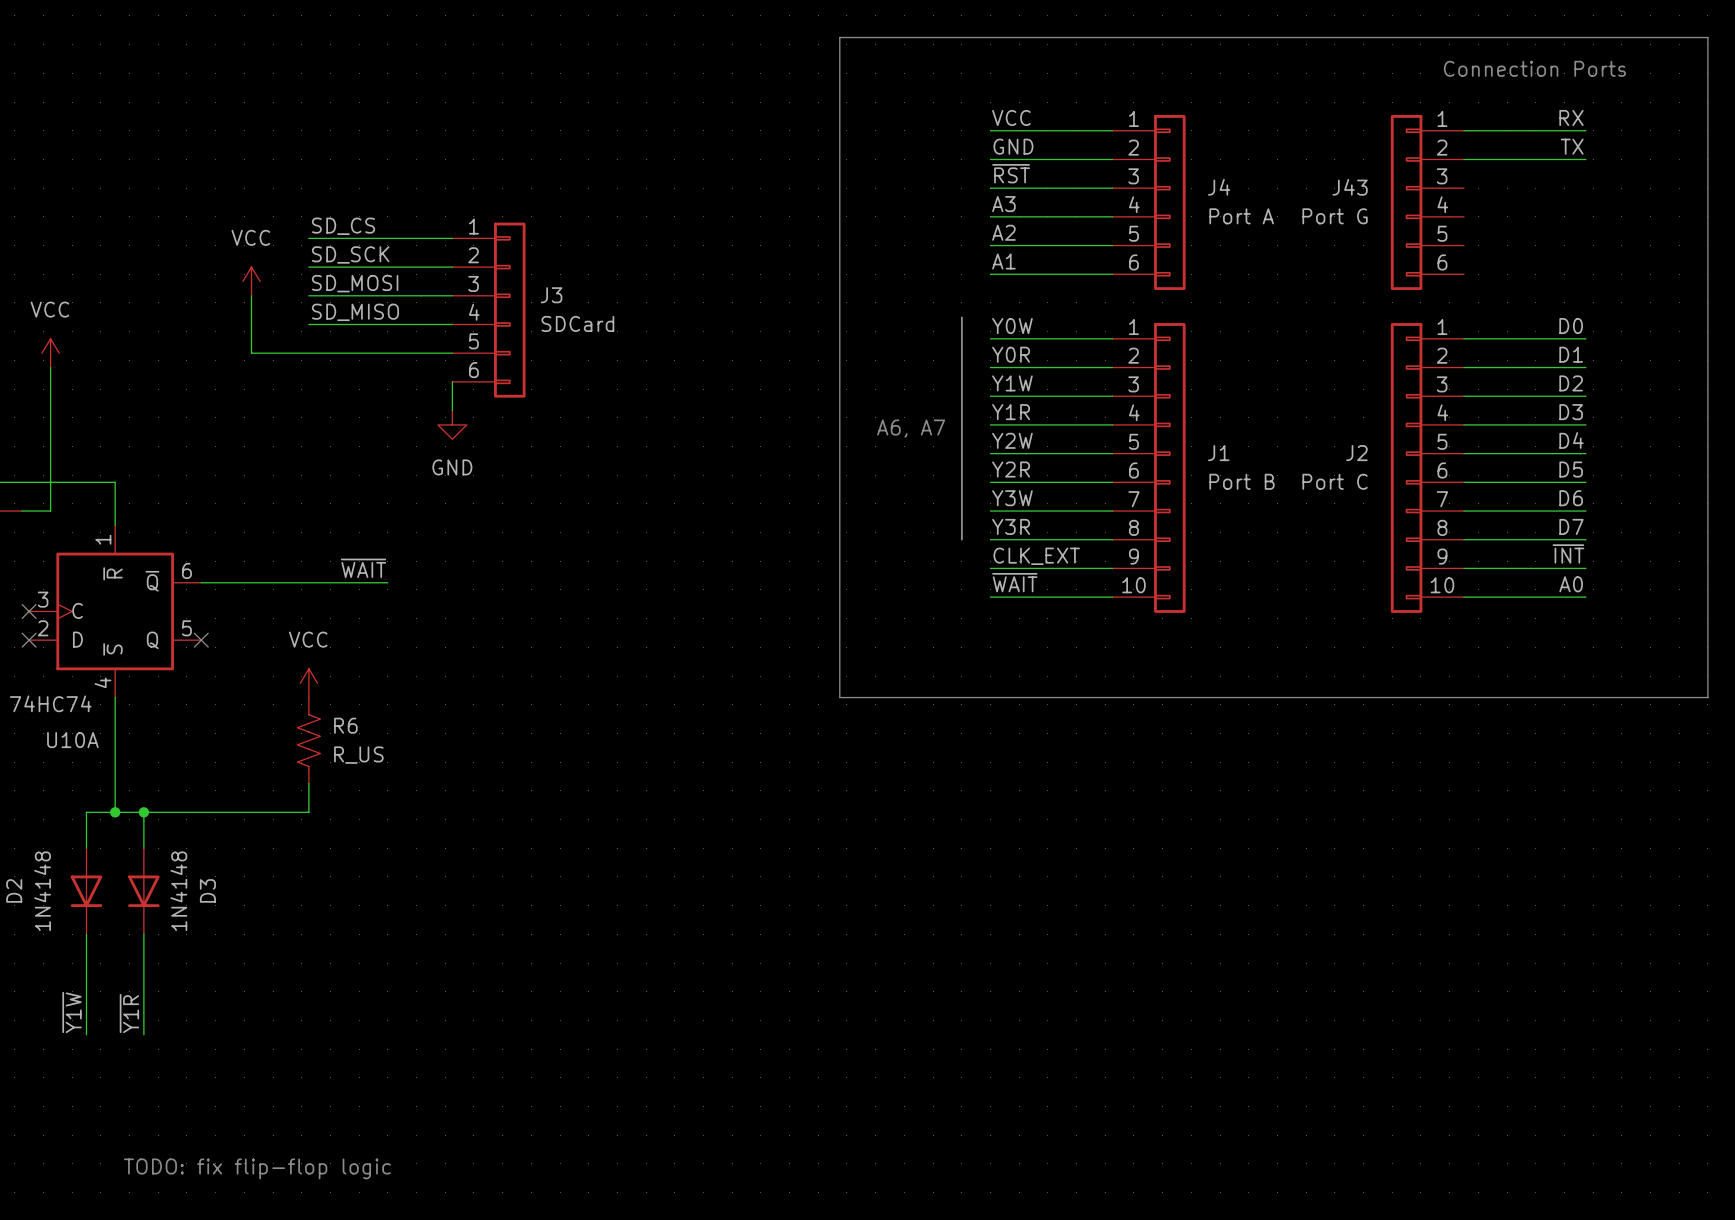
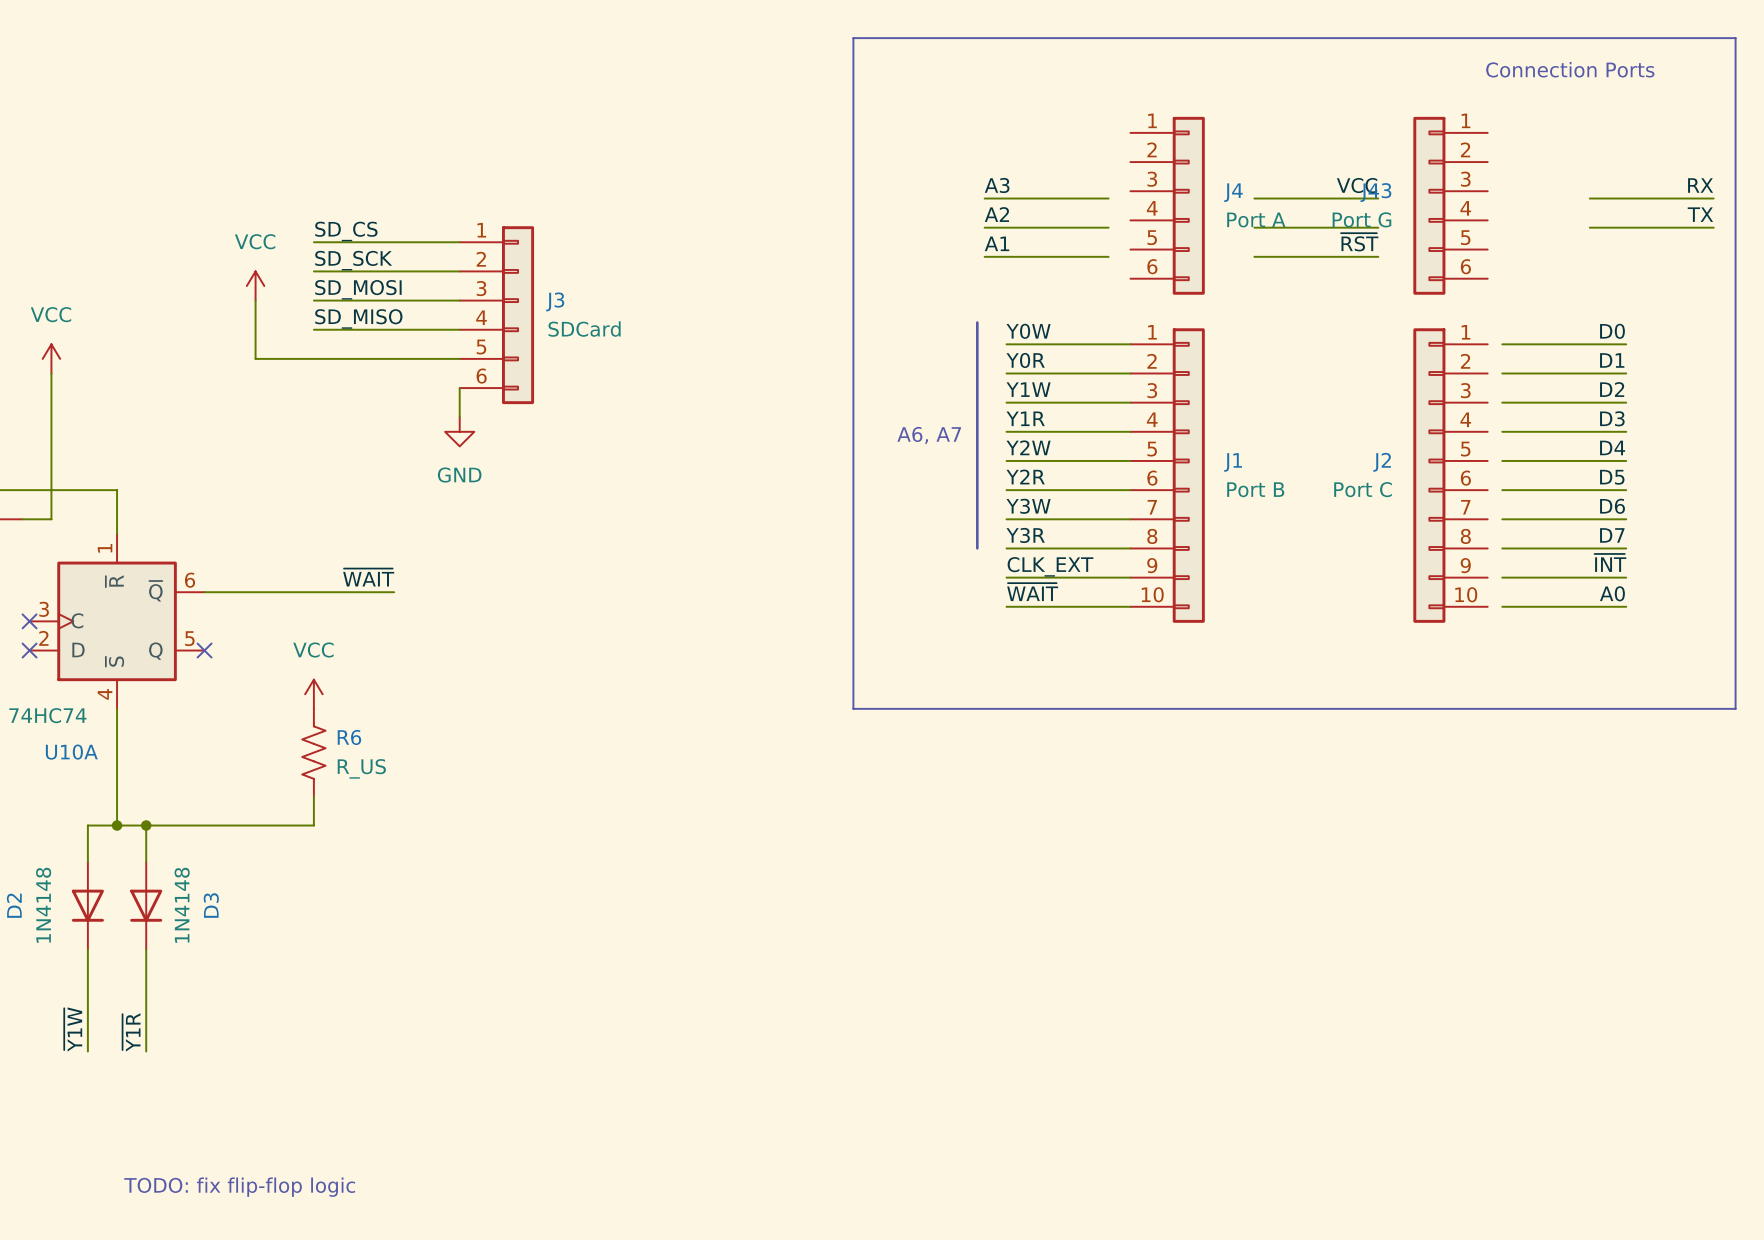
label: VCC (1011, 117) -> none
label position: RX (1571, 117) -> RX (1700, 185)
wire: (990, 130) (1112, 130) -> (1254, 227) (1378, 227)
wire: (1463, 130) (1585, 130) -> (1589, 198) (1713, 198)
label: GND (1013, 146) -> none
label position: TX (1572, 146) -> TX (1700, 214)
wire: (990, 159) (1112, 159) -> (1254, 198) (1378, 198)
wire: (1463, 159) (1585, 159) -> (1589, 227) (1713, 227)
label: ~{RST} (1011, 173) -> none
label: none -> VCC (1357, 185)
wire: (990, 188) (1112, 188) -> (984, 198) (1108, 198)
label position: A3 (1003, 204) -> A3 (997, 185)
wire: (990, 216) (1112, 216) -> (984, 227) (1108, 227)
label position: A2 (1003, 232) -> A2 (996, 214)
label: none -> ~{RST} (1359, 242)
wire: (990, 245) (1112, 245) -> (984, 256) (1108, 256)
label position: A1 (1003, 261) -> A1 (996, 243)
wire: (990, 274) (1112, 274) -> (1254, 256) (1378, 256)
label position: D0 (1571, 326) -> D0 (1612, 331)
wire: (1463, 338) (1478, 338) -> (1611, 344) (1626, 344)
label position: D1 (1571, 354) -> D1 (1612, 360)
wire: (1463, 367) (1478, 367) -> (1611, 373) (1626, 373)
label position: D2 (1571, 383) -> D2 (1612, 389)
wire: (1463, 396) (1478, 396) -> (1611, 402) (1626, 402)
label position: D3 (1571, 412) -> D3 (1612, 418)
wire: (1463, 424) (1478, 424) -> (1611, 431) (1626, 431)
label position: D4 (1571, 440) -> D4 (1612, 447)
wire: (1463, 453) (1478, 453) -> (1611, 460) (1626, 460)
label position: D5 (1571, 469) -> D5 (1612, 477)
wire: (1463, 482) (1478, 482) -> (1611, 490) (1626, 490)
label position: D6 (1571, 498) -> D6 (1612, 506)
wire: (1463, 511) (1478, 511) -> (1611, 519) (1626, 519)
label position: D7 (1571, 526) -> D7 (1612, 535)
wire: (1463, 539) (1478, 539) -> (1611, 548) (1626, 548)
label position: ~{INT} (1568, 553) -> ~{INT} (1610, 562)
wire: (1463, 568) (1478, 568) -> (1611, 577) (1626, 577)
label position: A0 (1571, 584) -> A0 (1612, 593)
wire: (1463, 597) (1478, 597) -> (1611, 606) (1626, 606)

